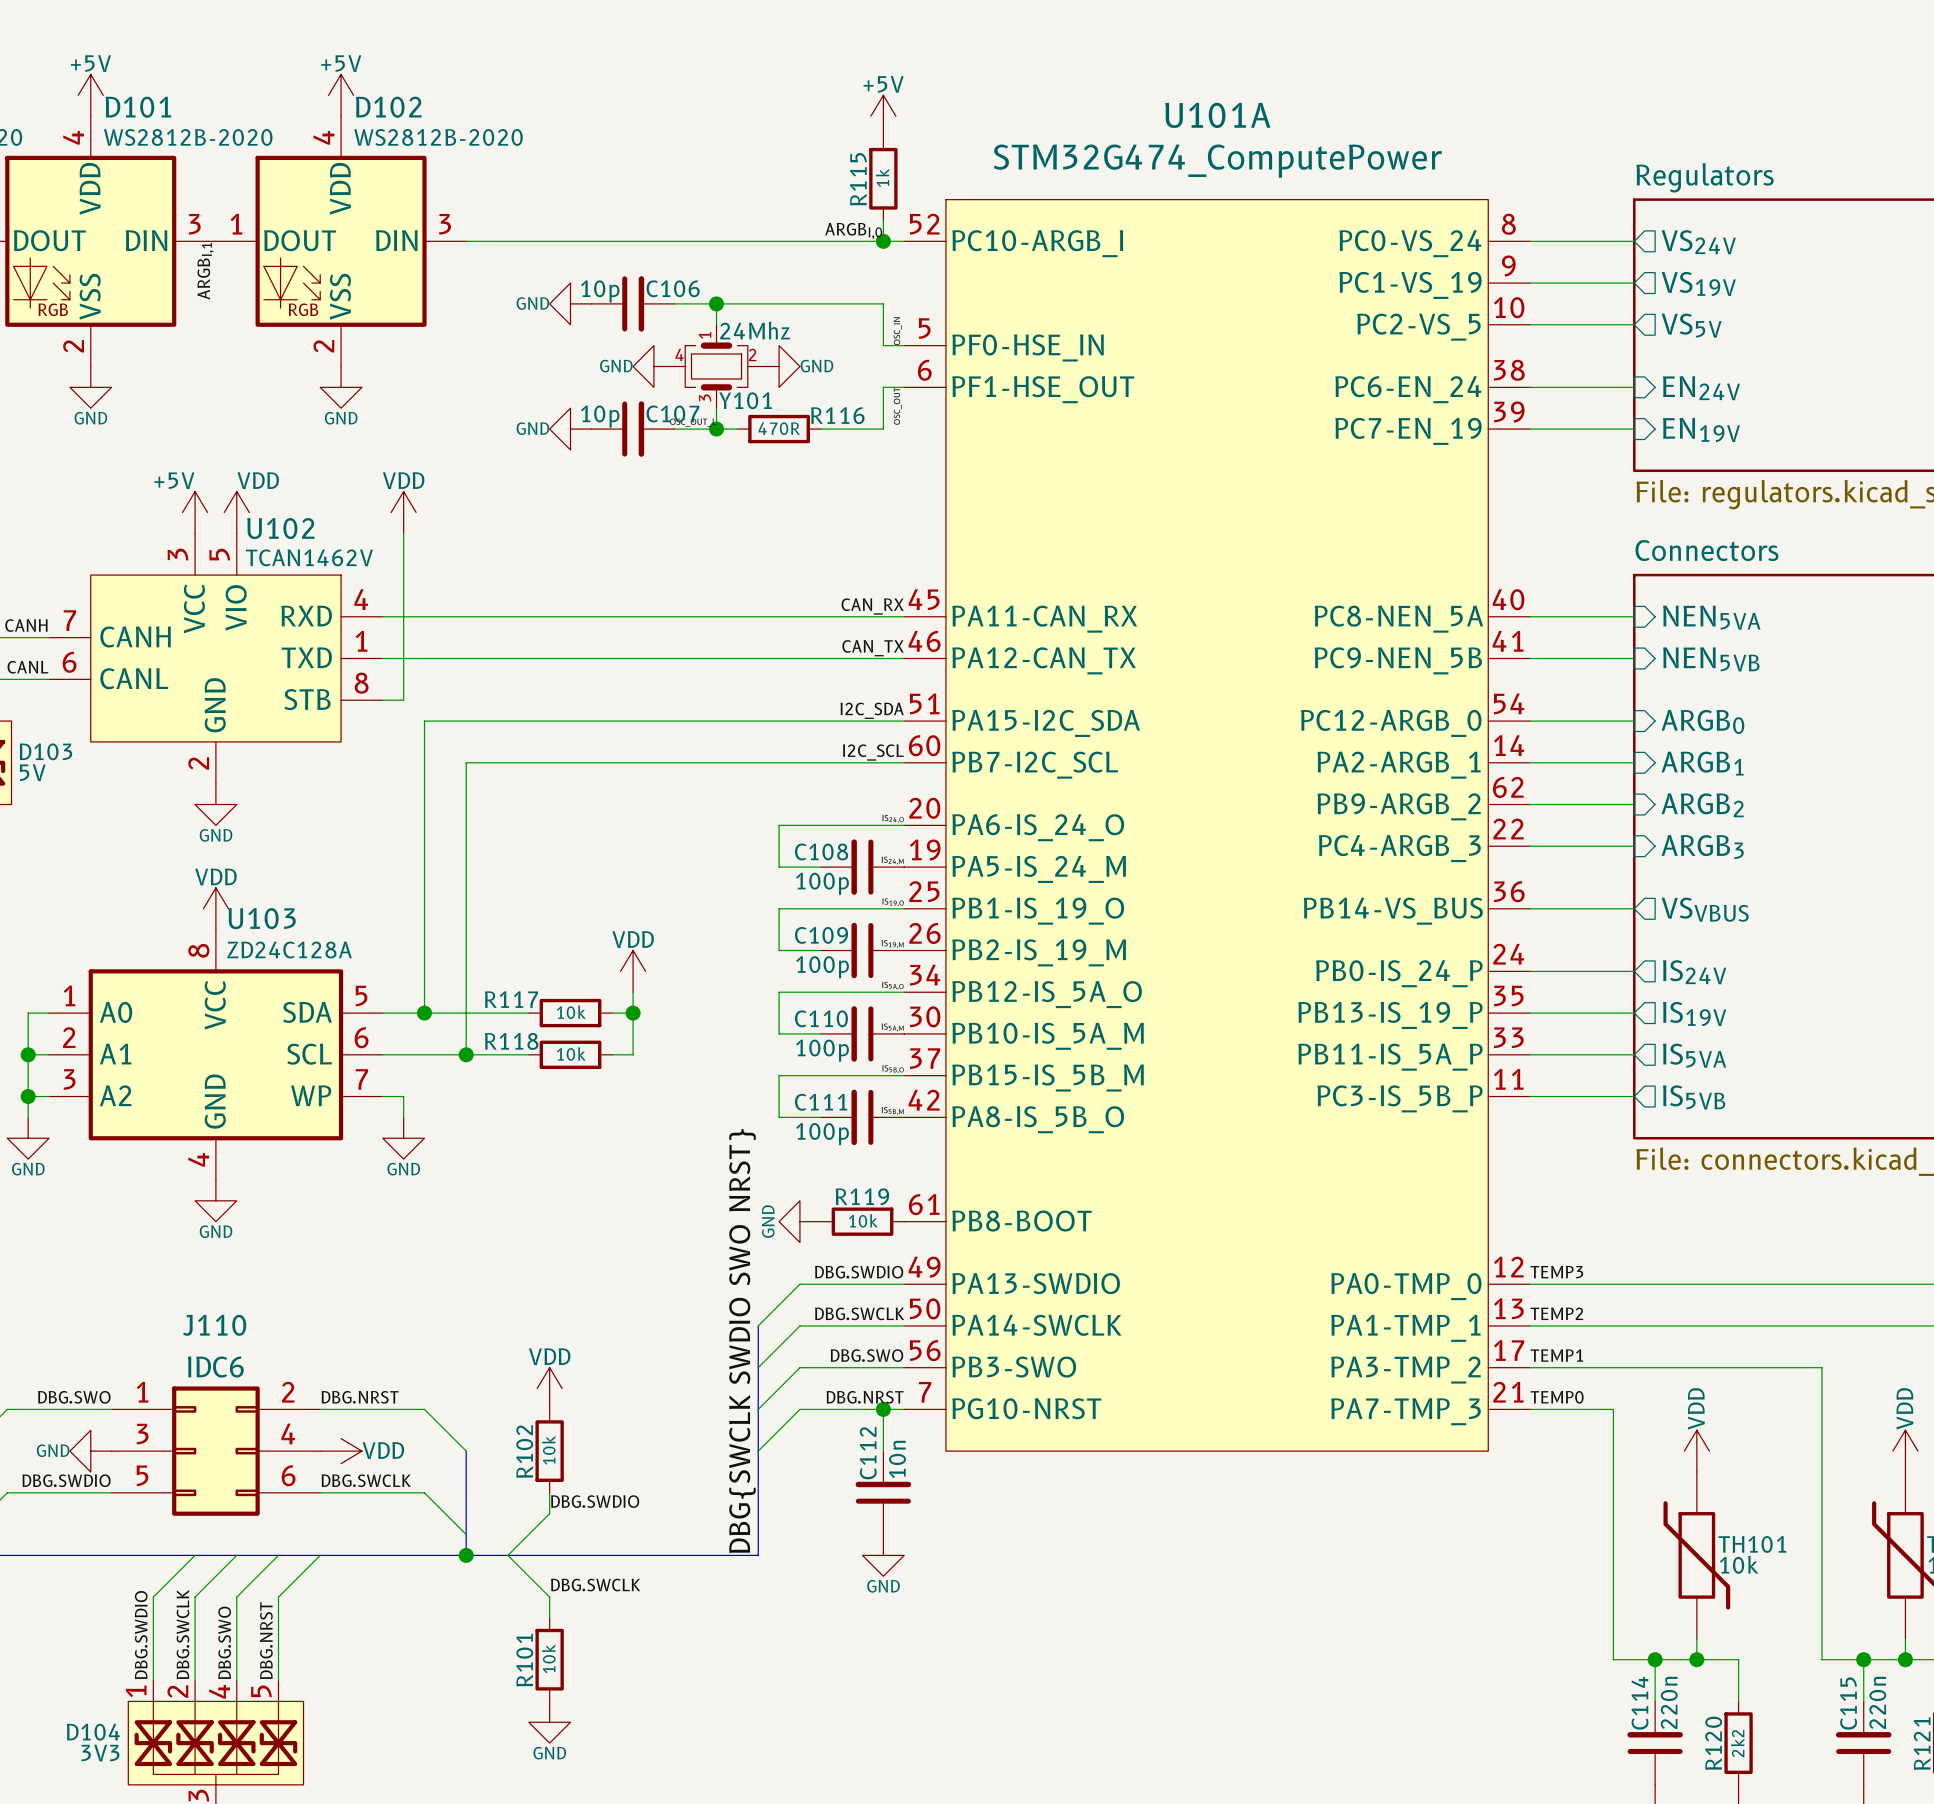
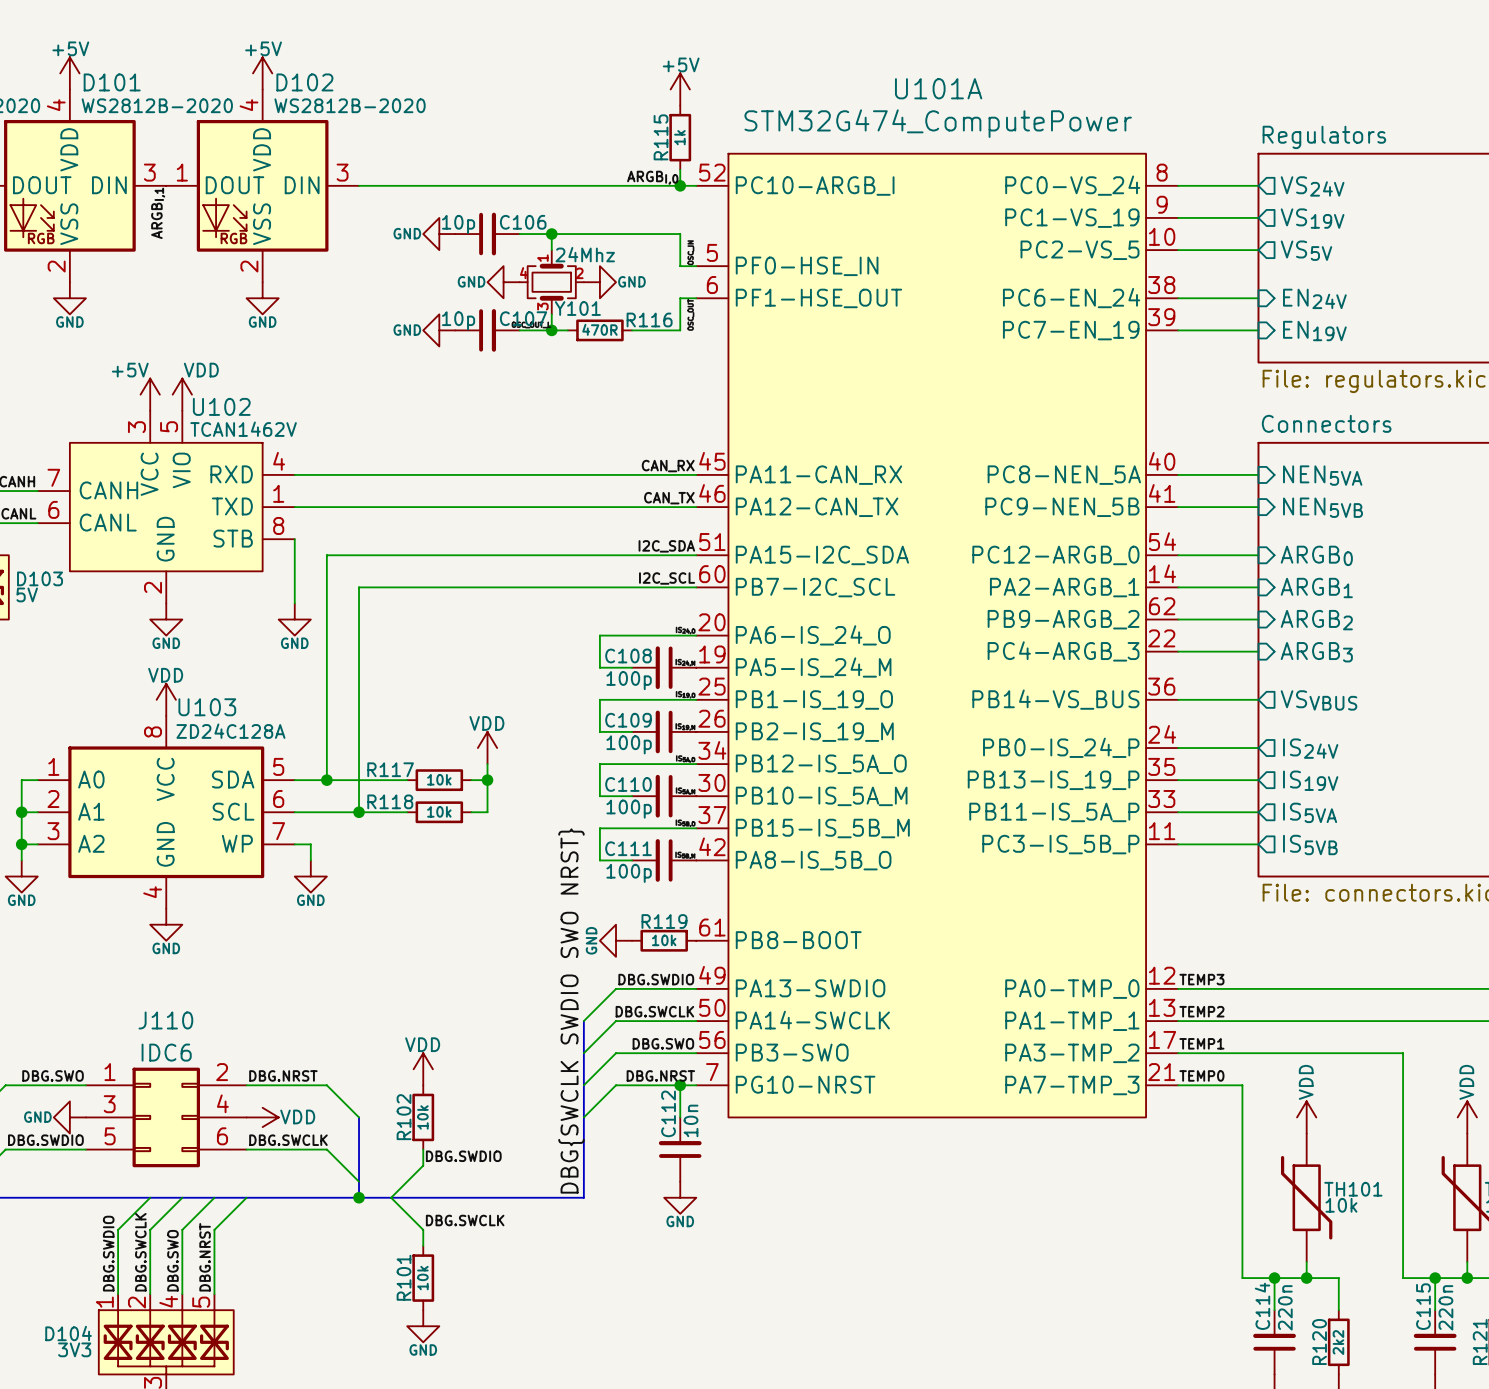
power symbol: VDD (403, 512) -> none
wire: (403, 533) (403, 700) (382, 700) -> (294, 603) (294, 539)
power symbol: none -> GND (294, 619)

